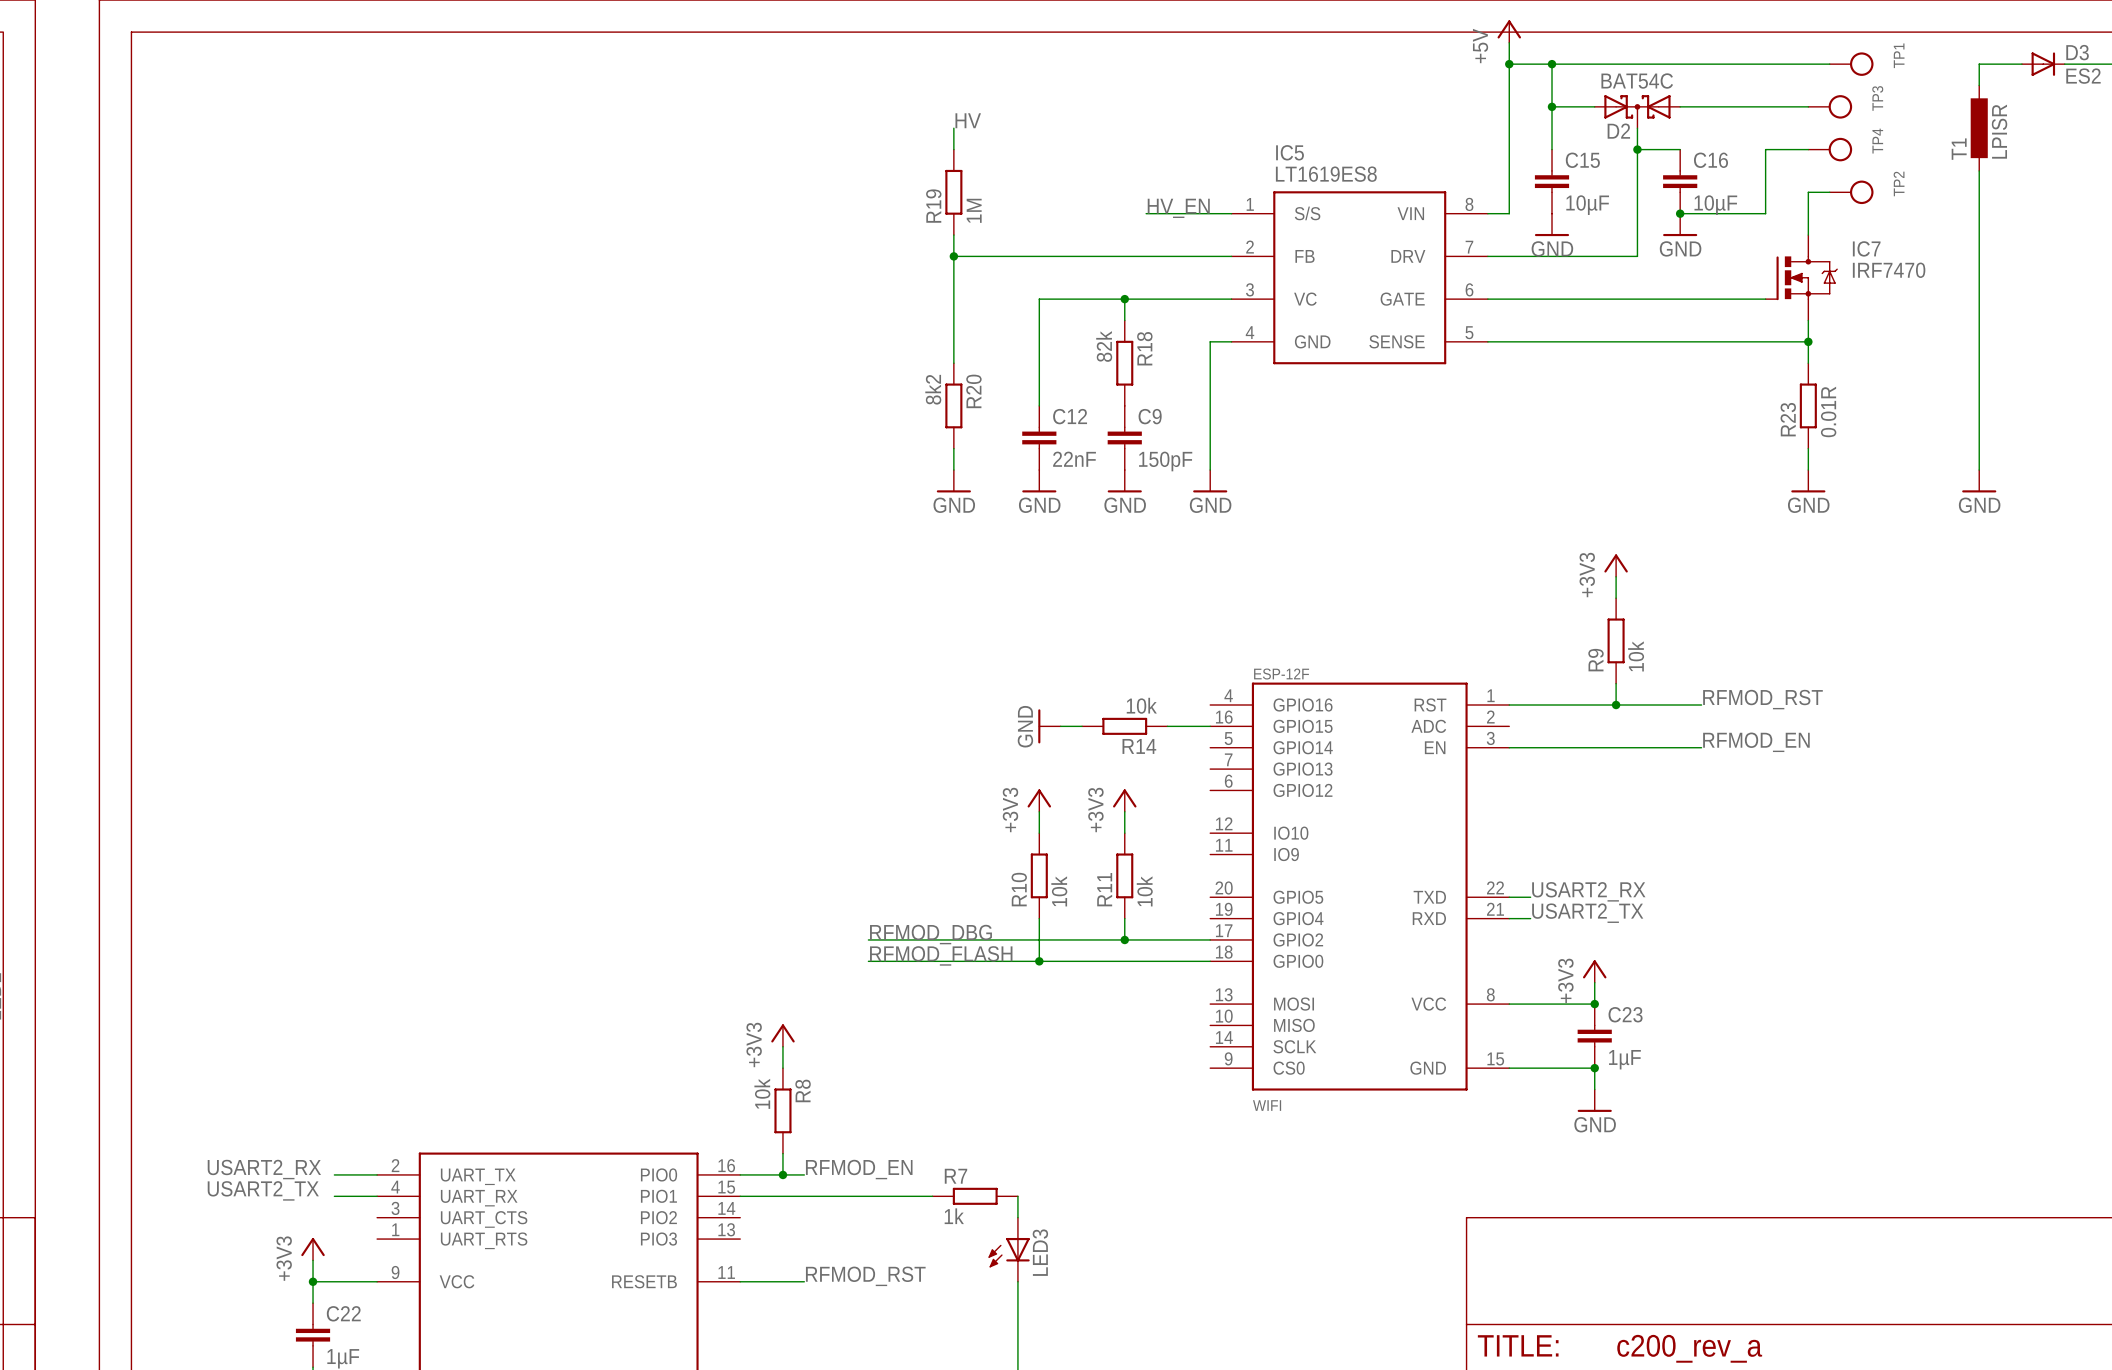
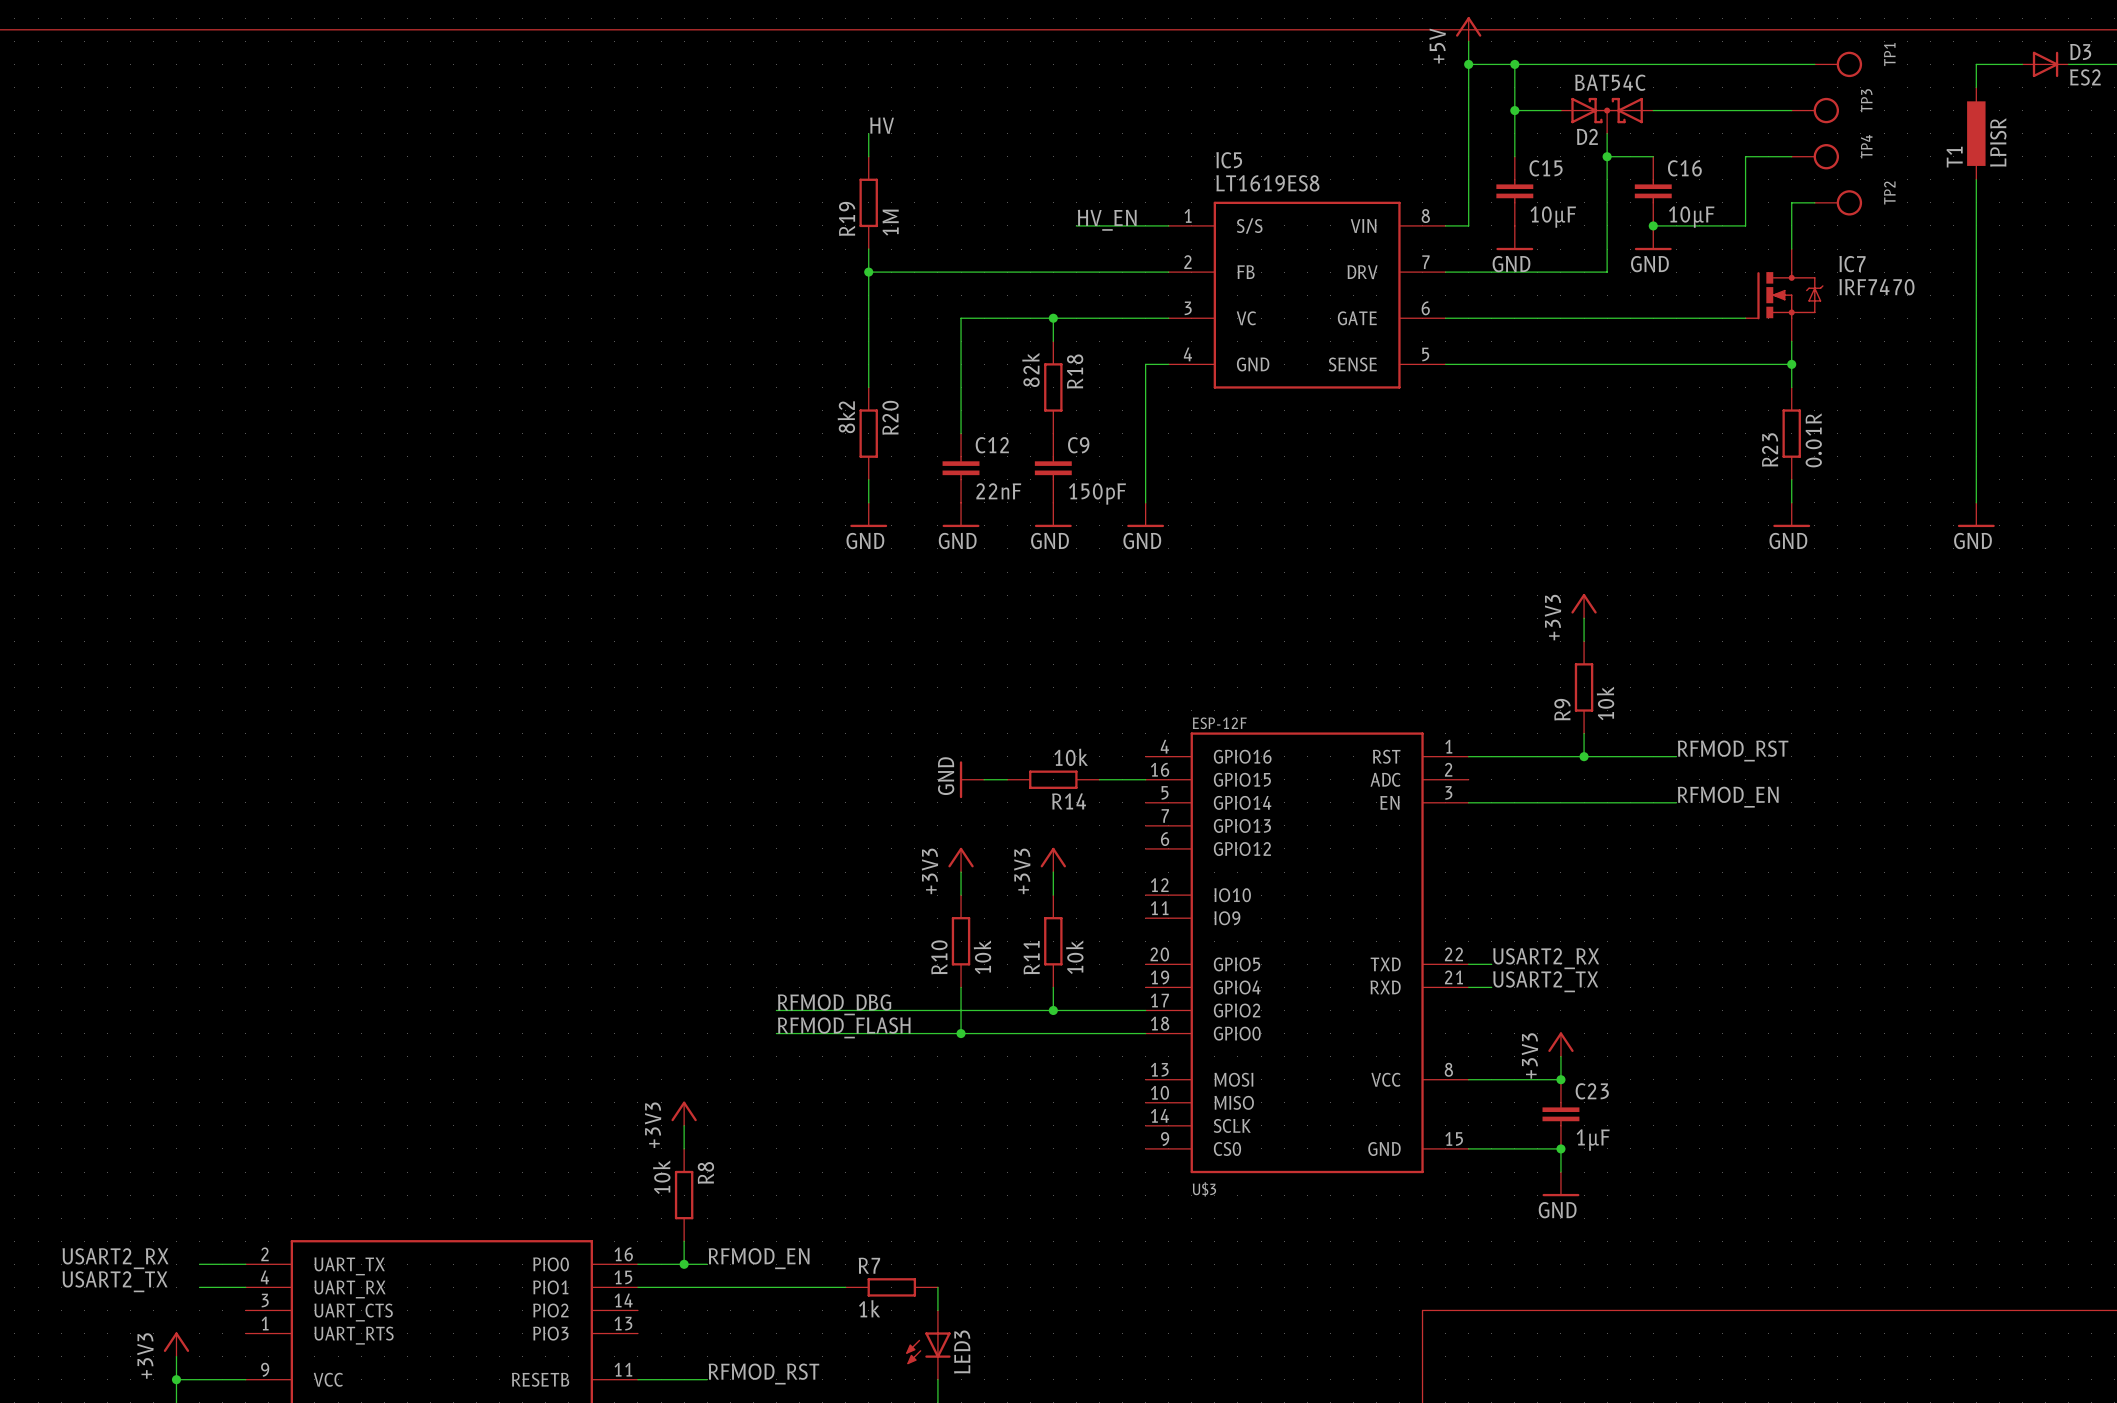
WIFI name: WIFI (1267, 1105) -> U$3 (1204, 1189)

